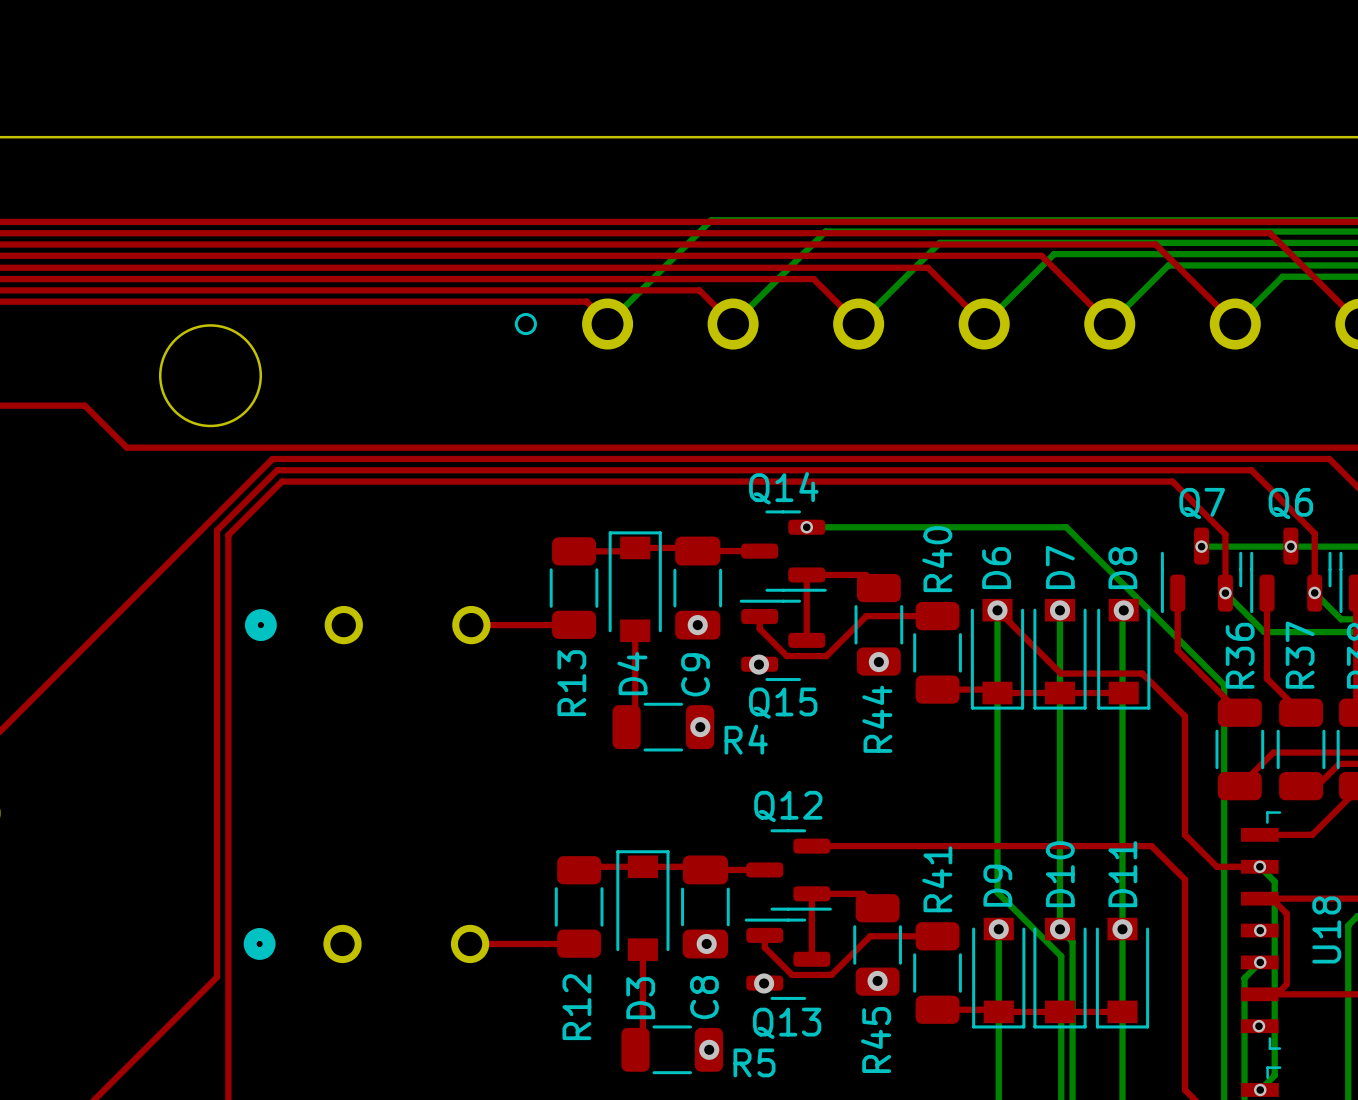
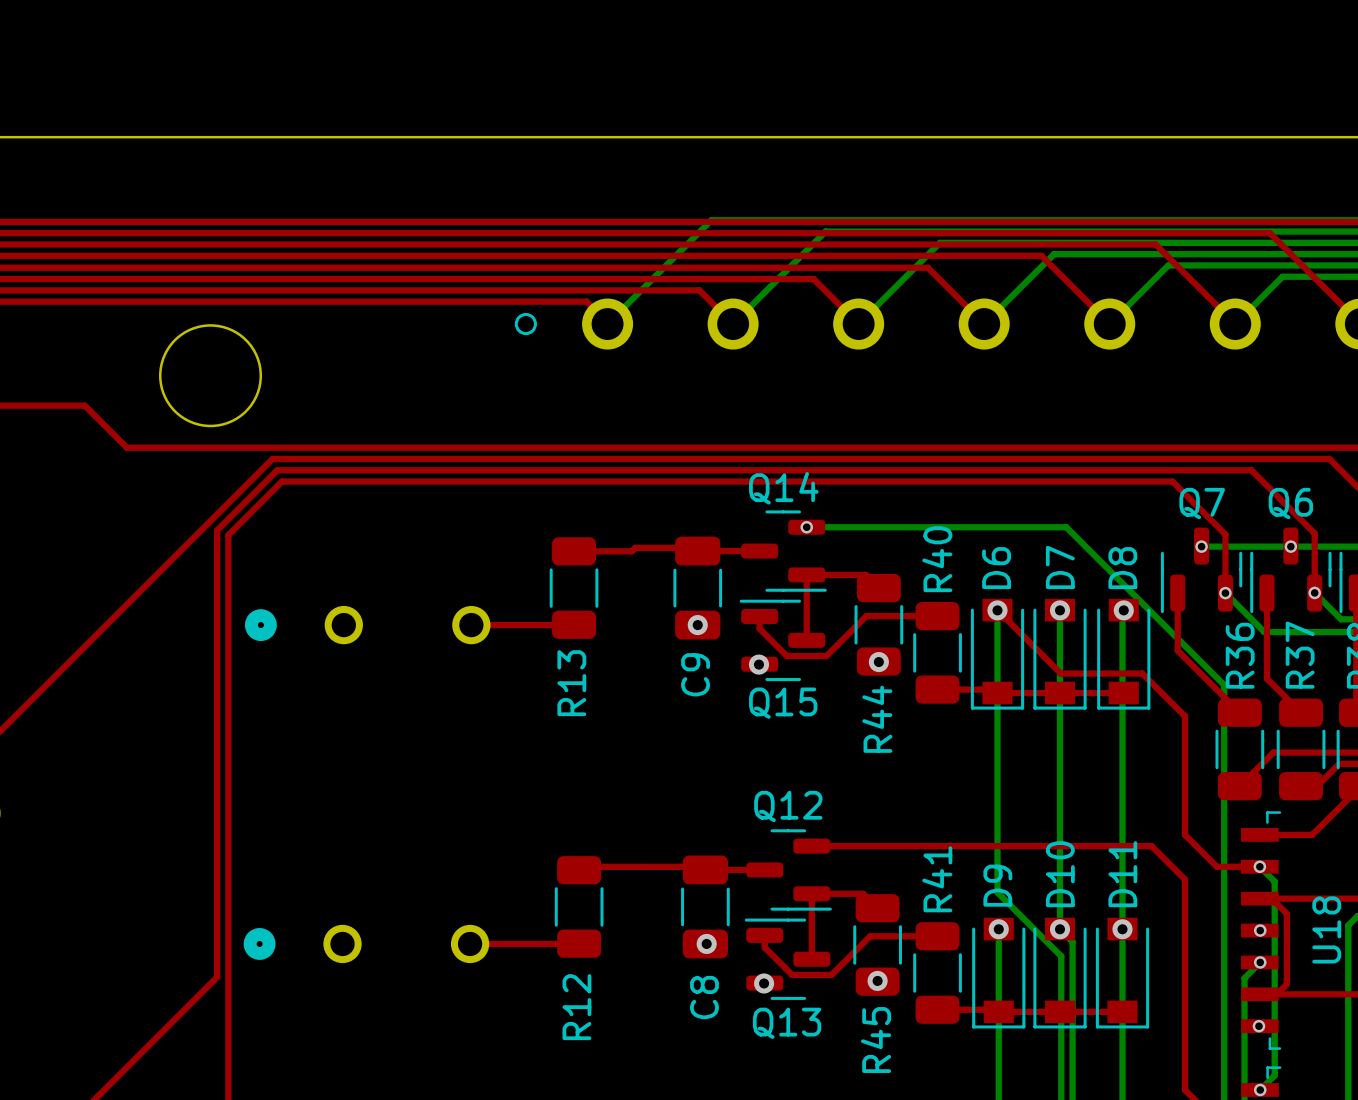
D4: (635, 586) -> none
top track: (635, 630) (635, 718) (626, 727) -> none
R4: (663, 727) -> none
via: (700, 727) -> none
D3: (642, 905) -> none
top track: (642, 949) (642, 1042) (635, 1049) -> none
R5: (672, 1049) -> none
via: (709, 1049) -> none

